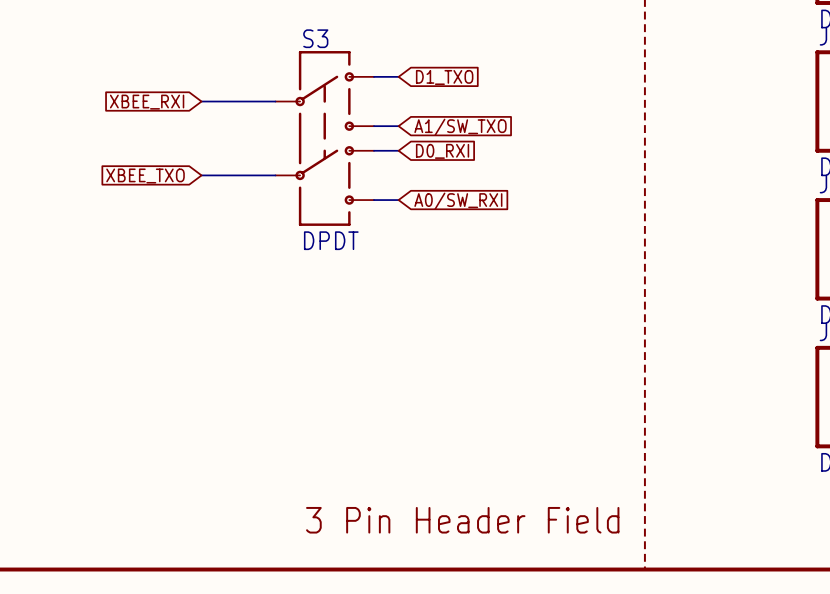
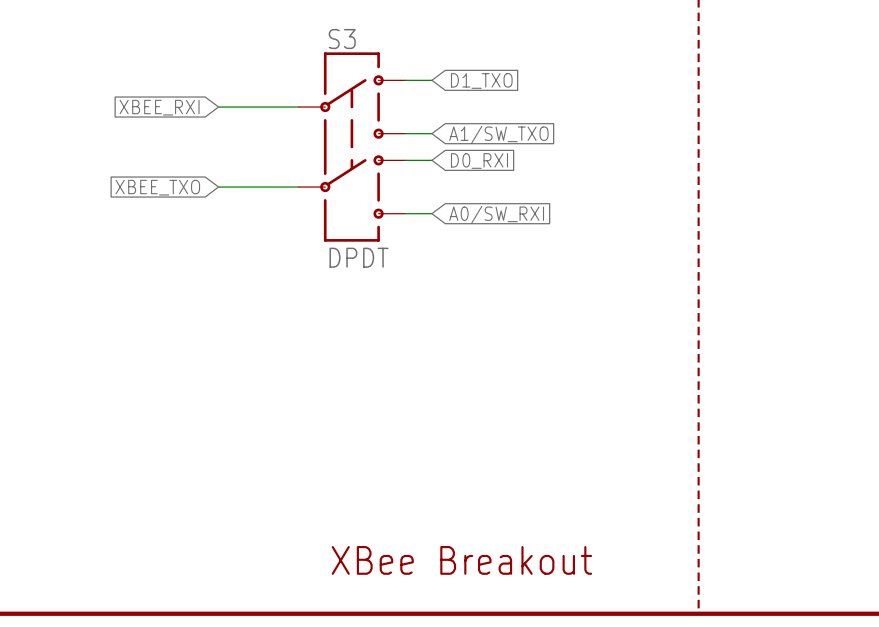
text: 3 Pin Header Field (462, 520) -> XBee Breakout (461, 560)

